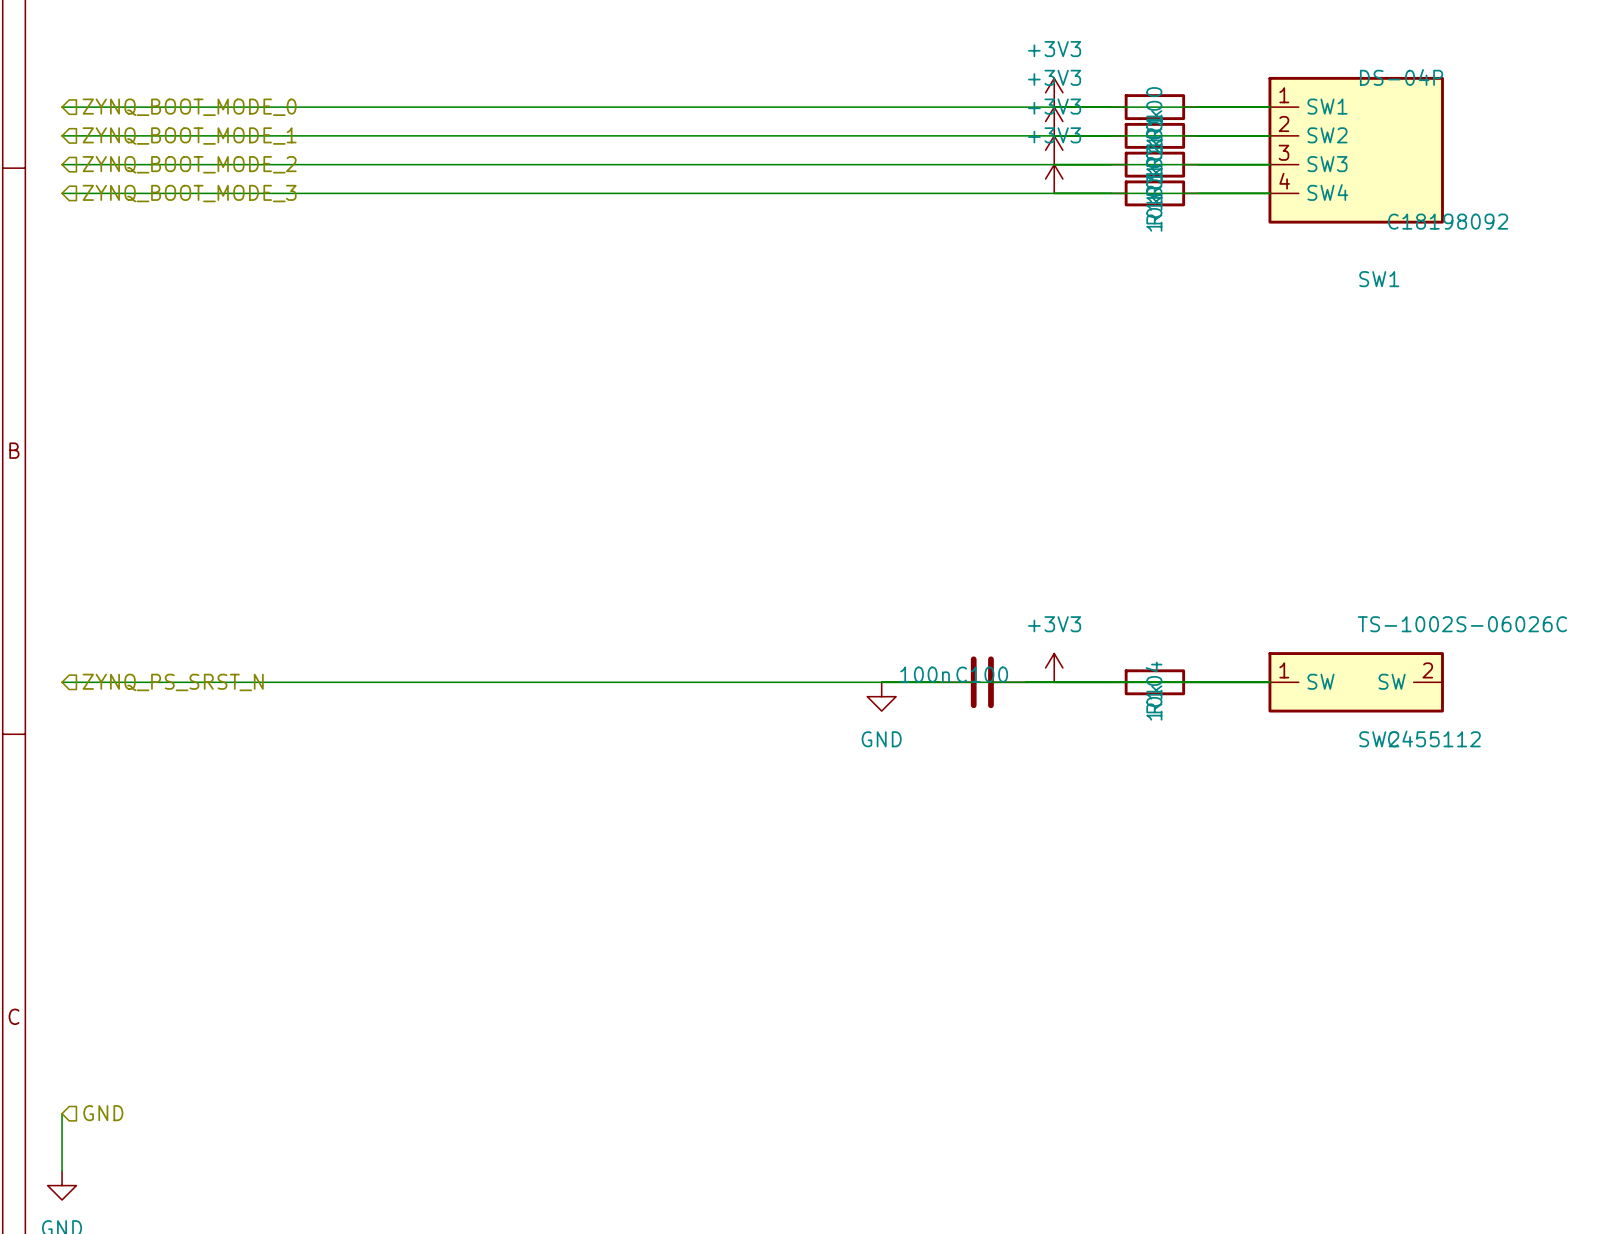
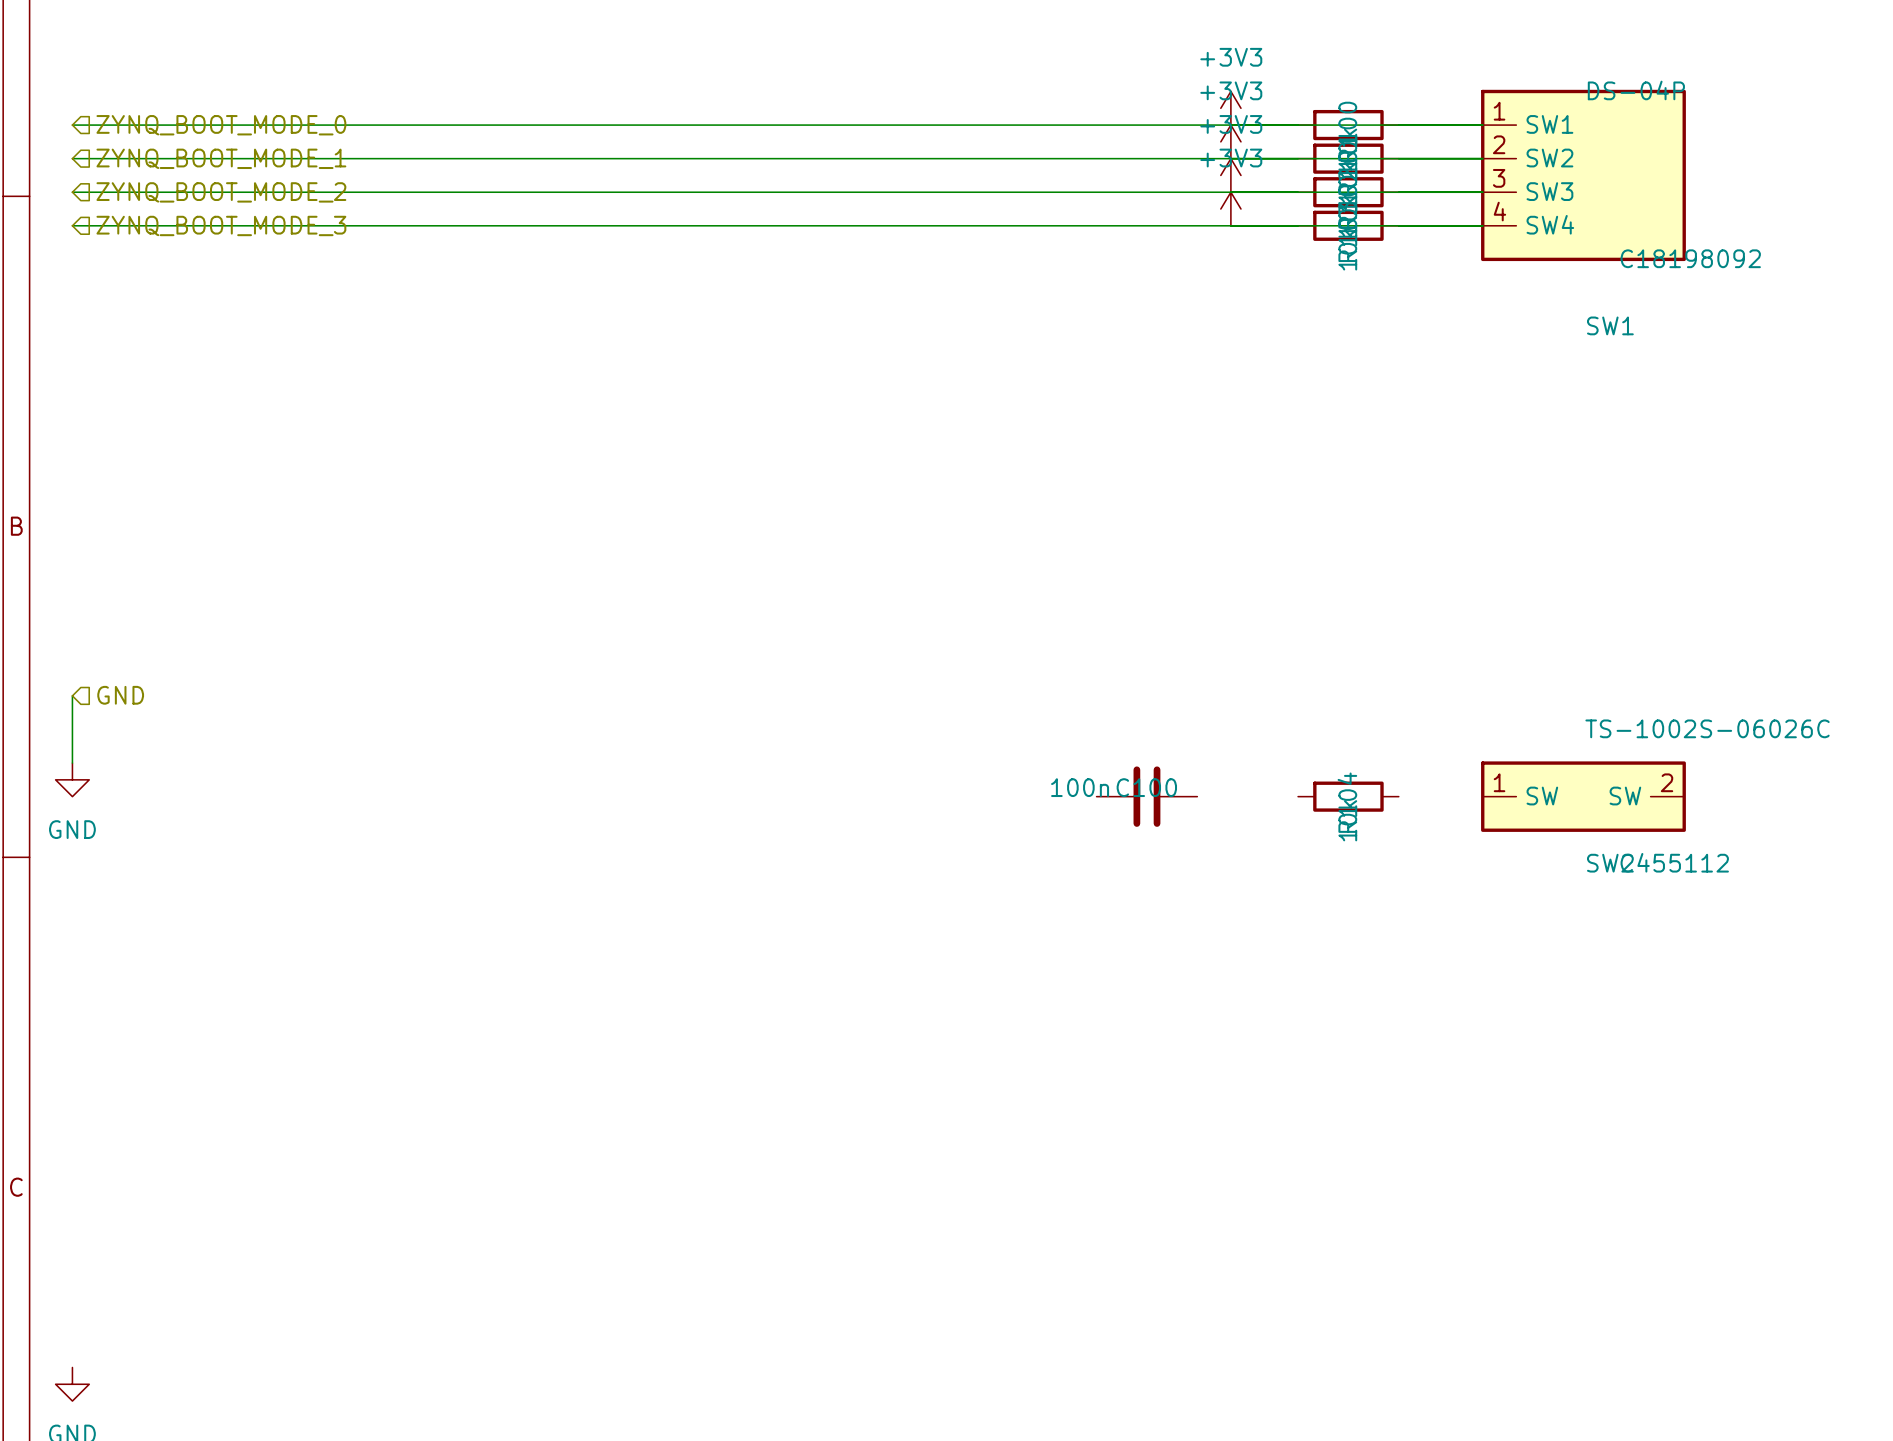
hierarchical label: none -> GND (120, 695)
wire: none -> (72, 695) (72, 763)
power symbol: none -> GND (72, 779)
power symbol: +3V3 (1054, 667) -> none
wire: (62, 682) (1269, 682) -> none
hierarchical label: ZYNQ_PS_SRST_N (173, 682) -> none
power symbol: GND (881, 696) -> none
wire: (62, 1113) (62, 1171) -> none
hierarchical label: GND (103, 1113) -> none

